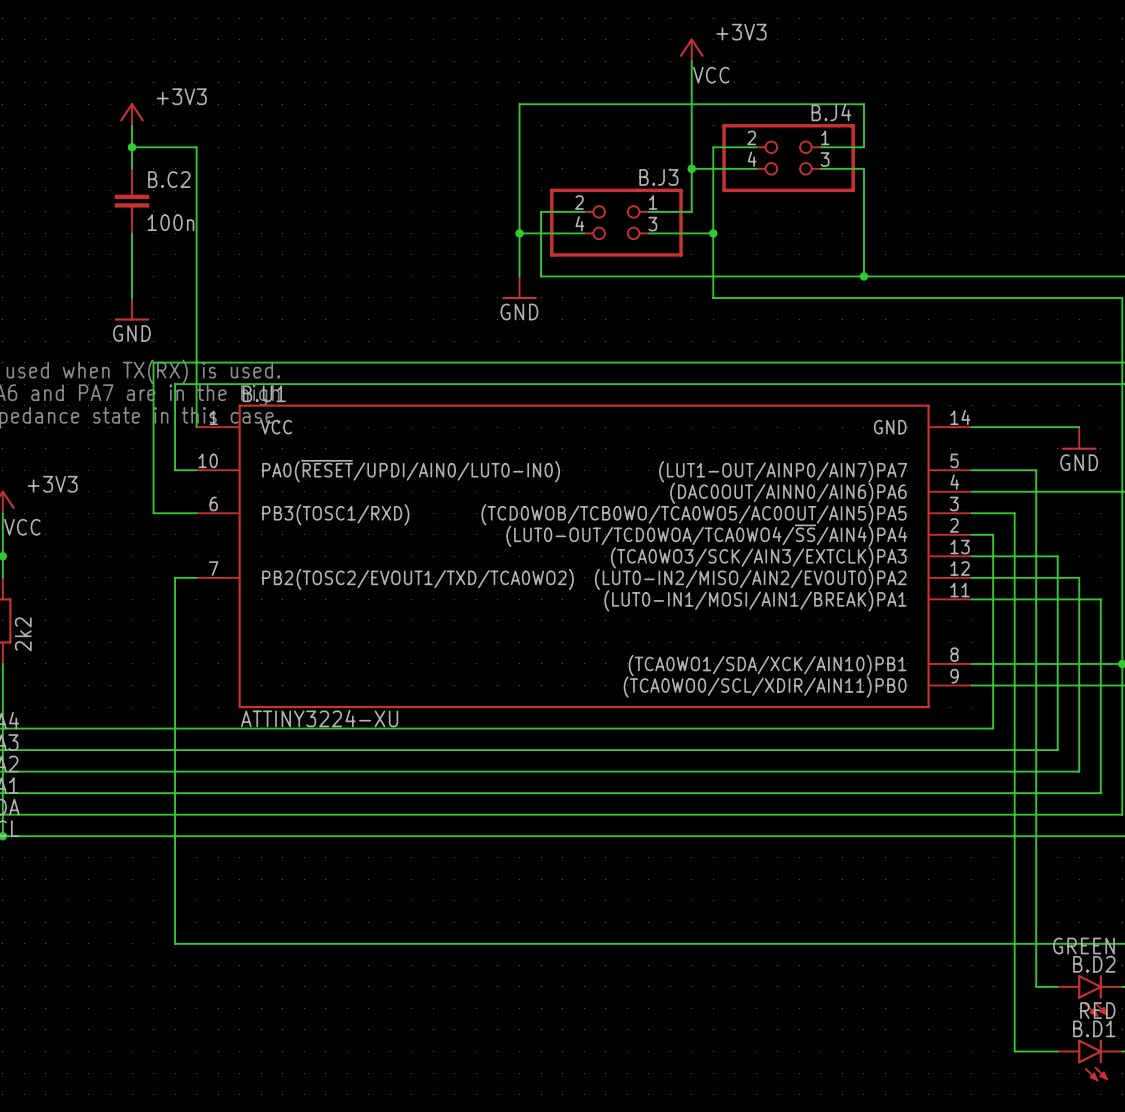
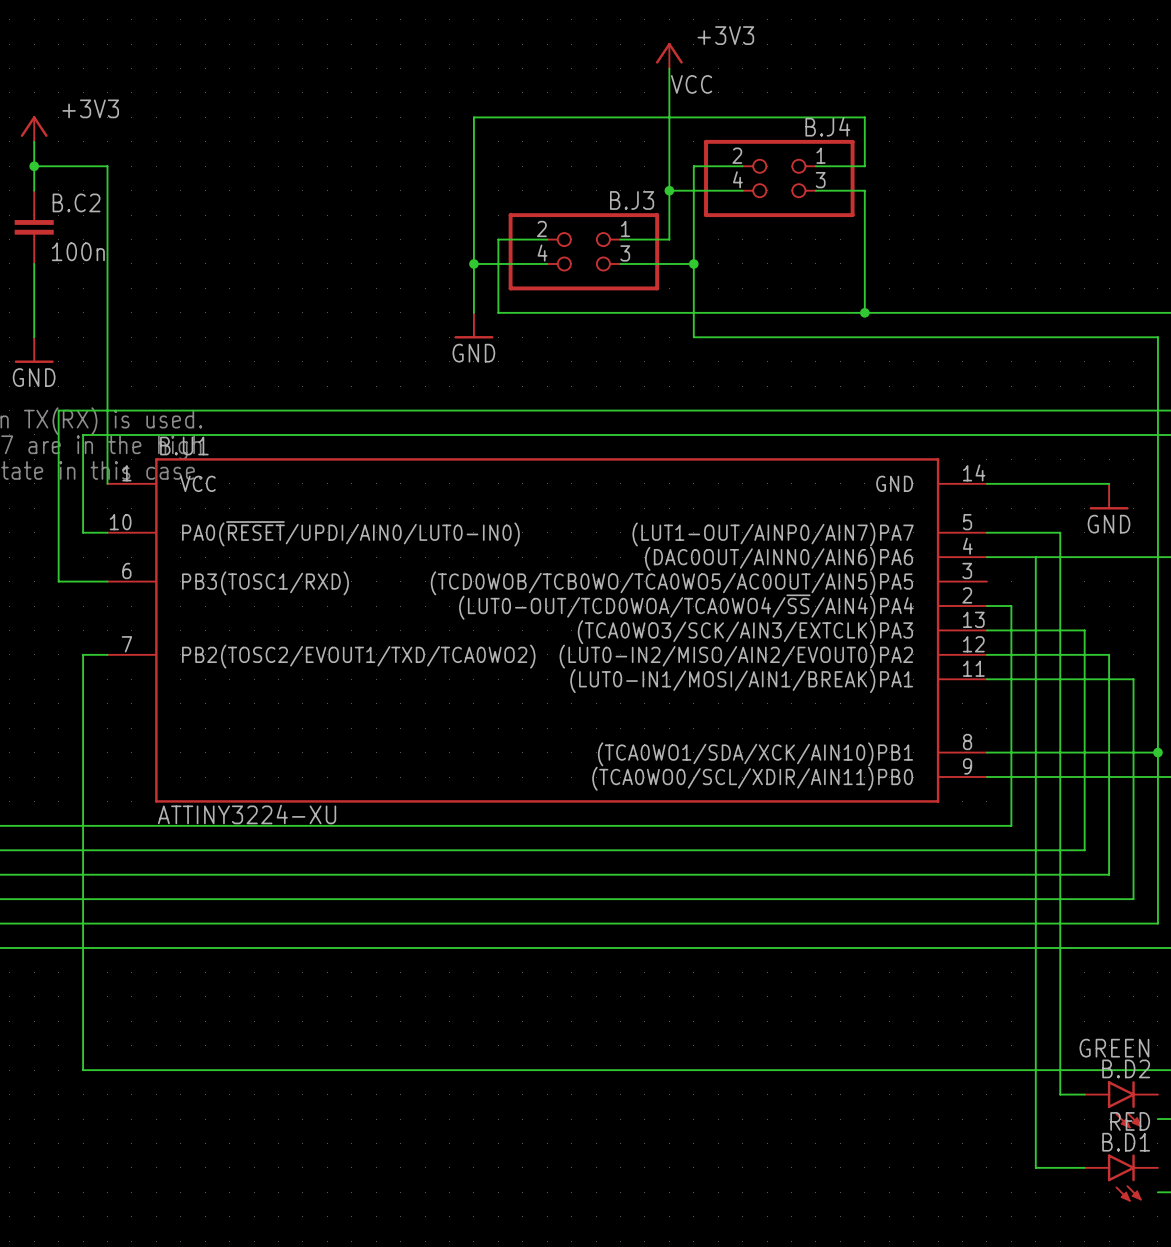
wire: (971, 513) (1014, 513) -> (1035, 557) (1035, 581)
wire: (1036, 965) (1036, 986) (1057, 986) -> (1060, 1094) (1084, 1094)
B.D2 position: (1090, 995) -> (1121, 1104)
wire: (1014, 1029) (1014, 1051) (1057, 1051) -> (1035, 1167) (1084, 1167)
B.D1 position: (1090, 1060) -> (1121, 1178)

